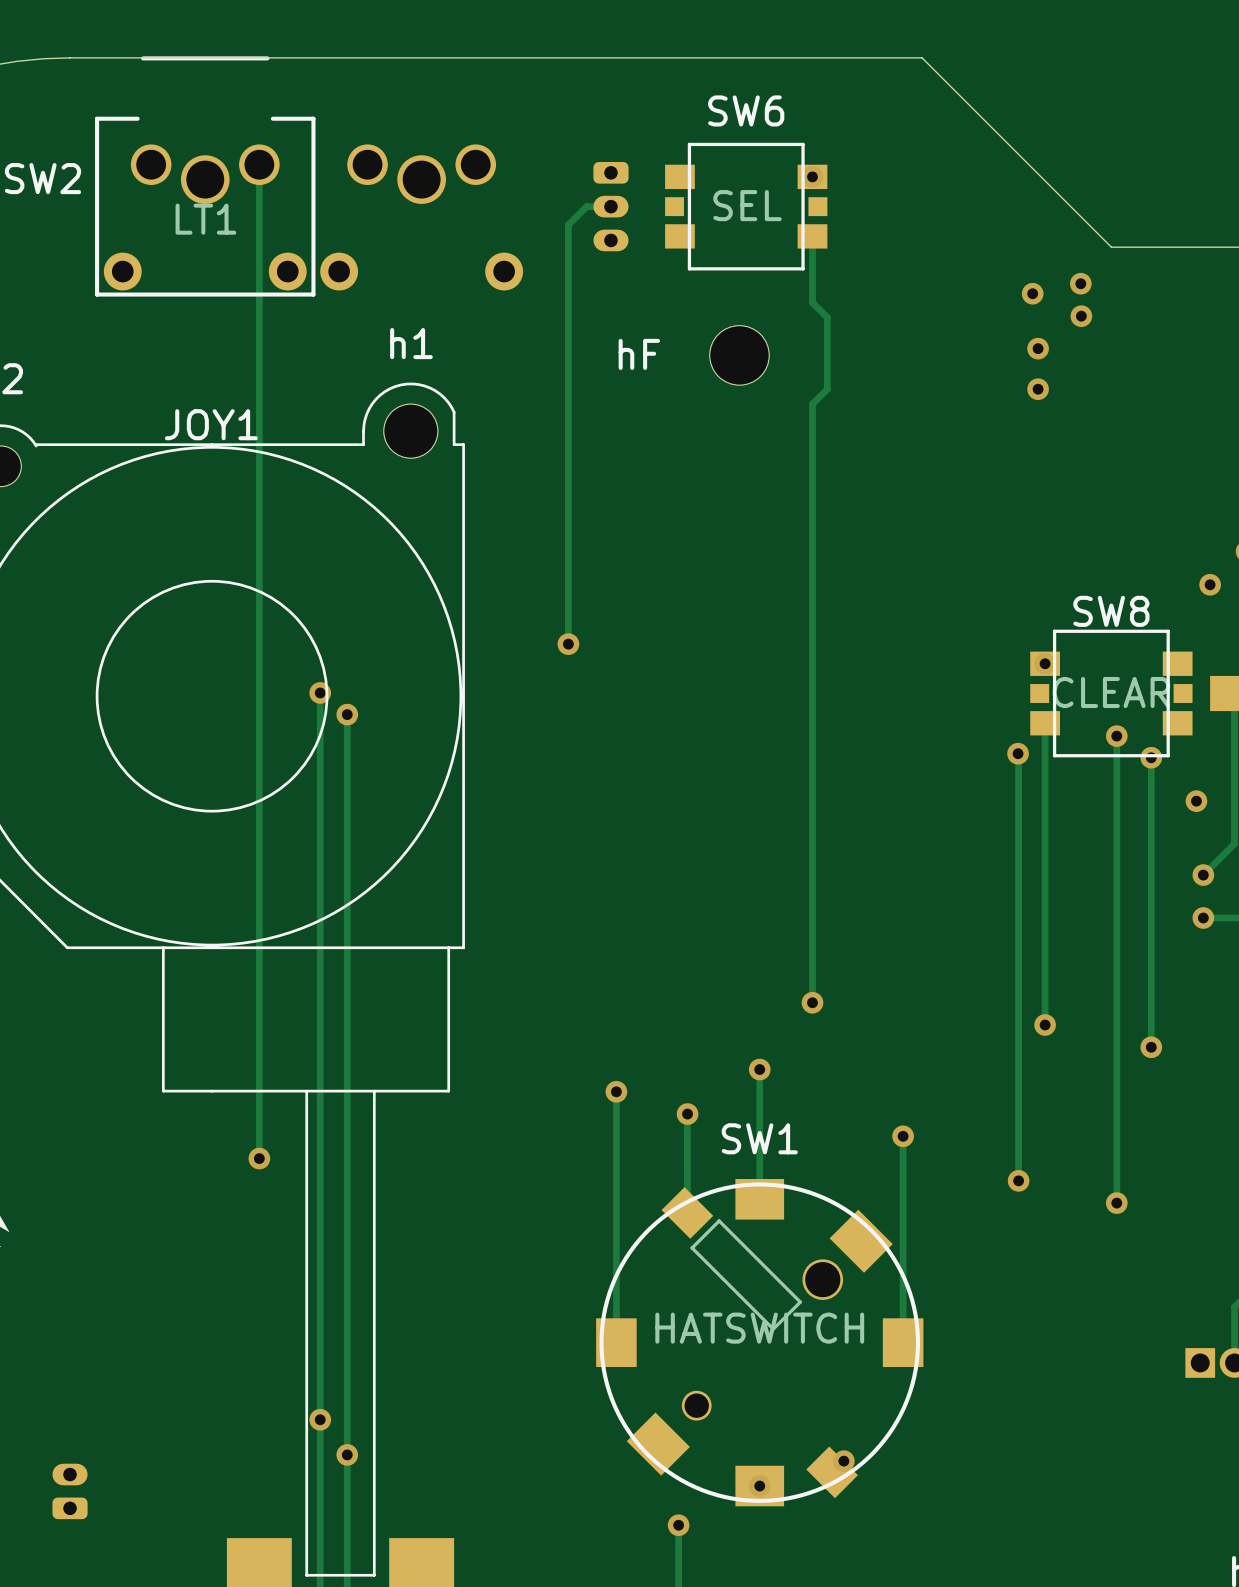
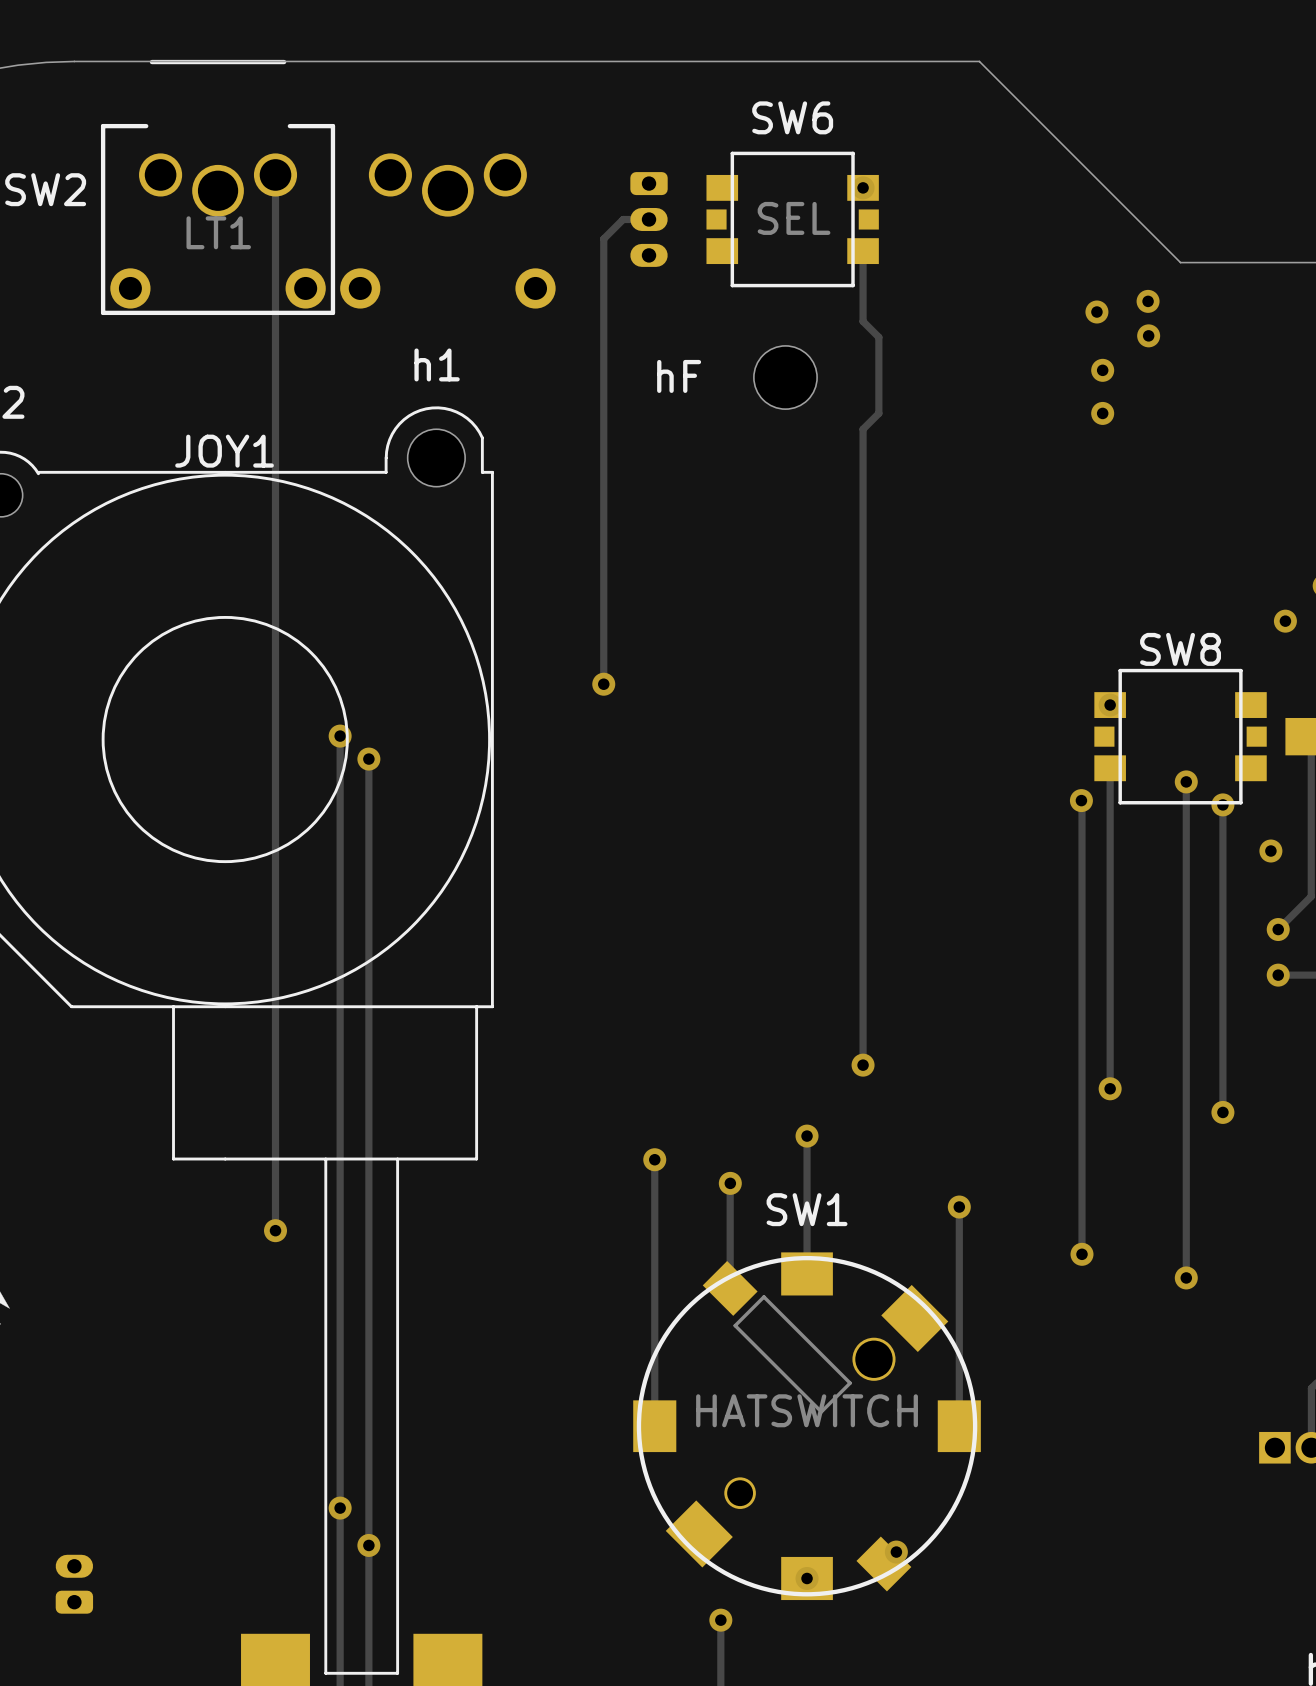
SW8 value: CLEAR (1111, 692) -> none

